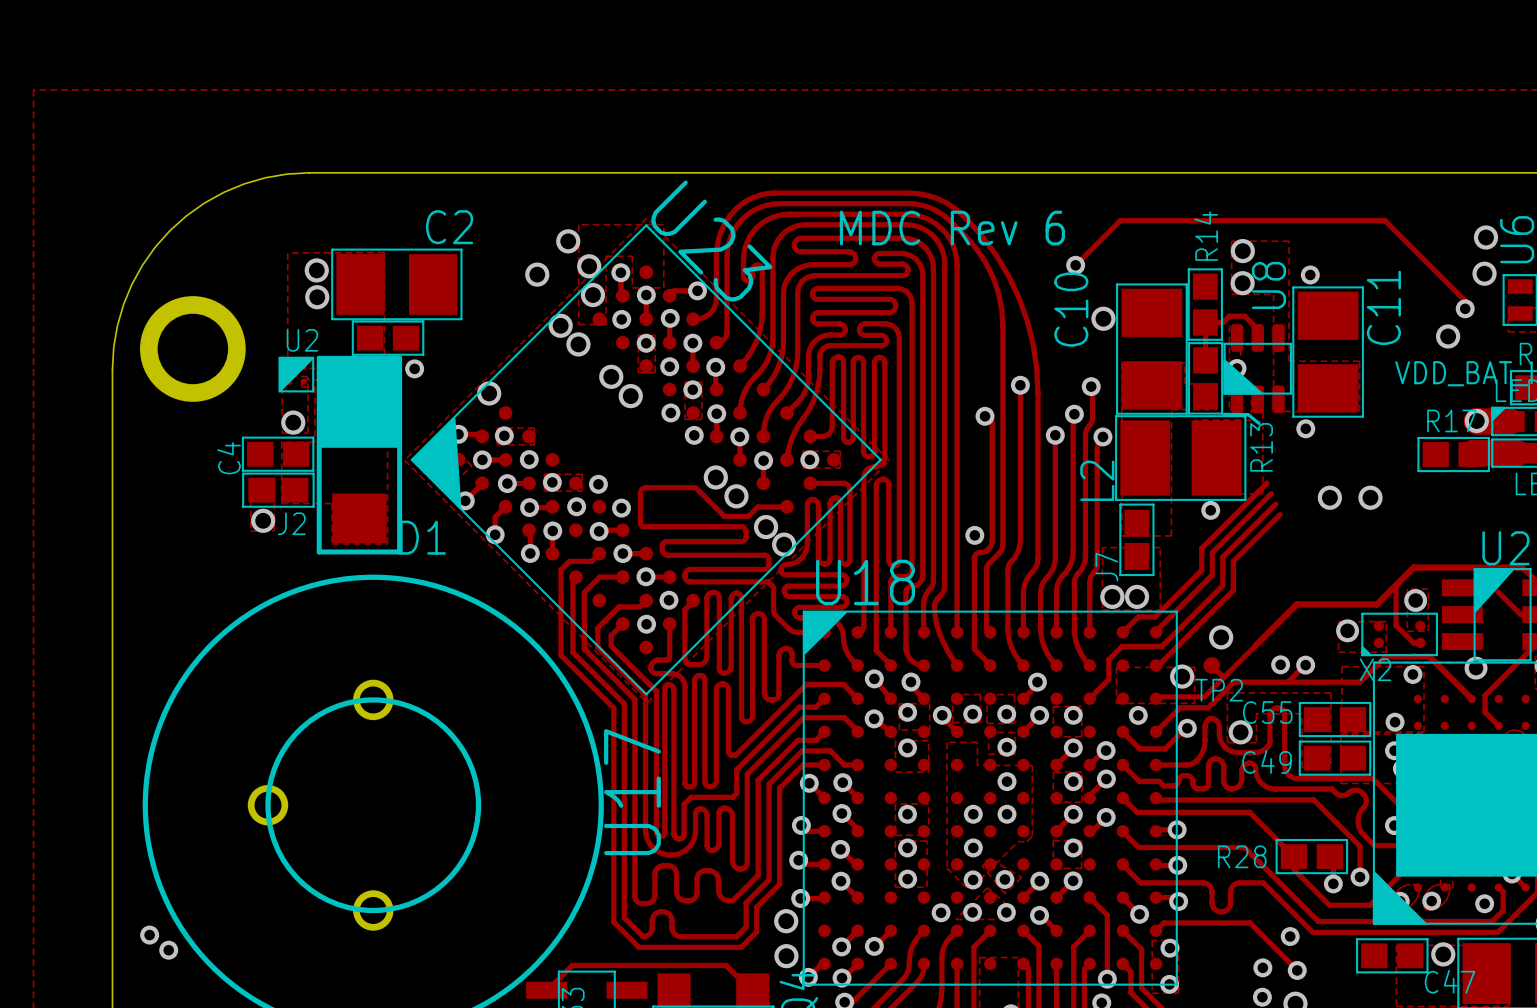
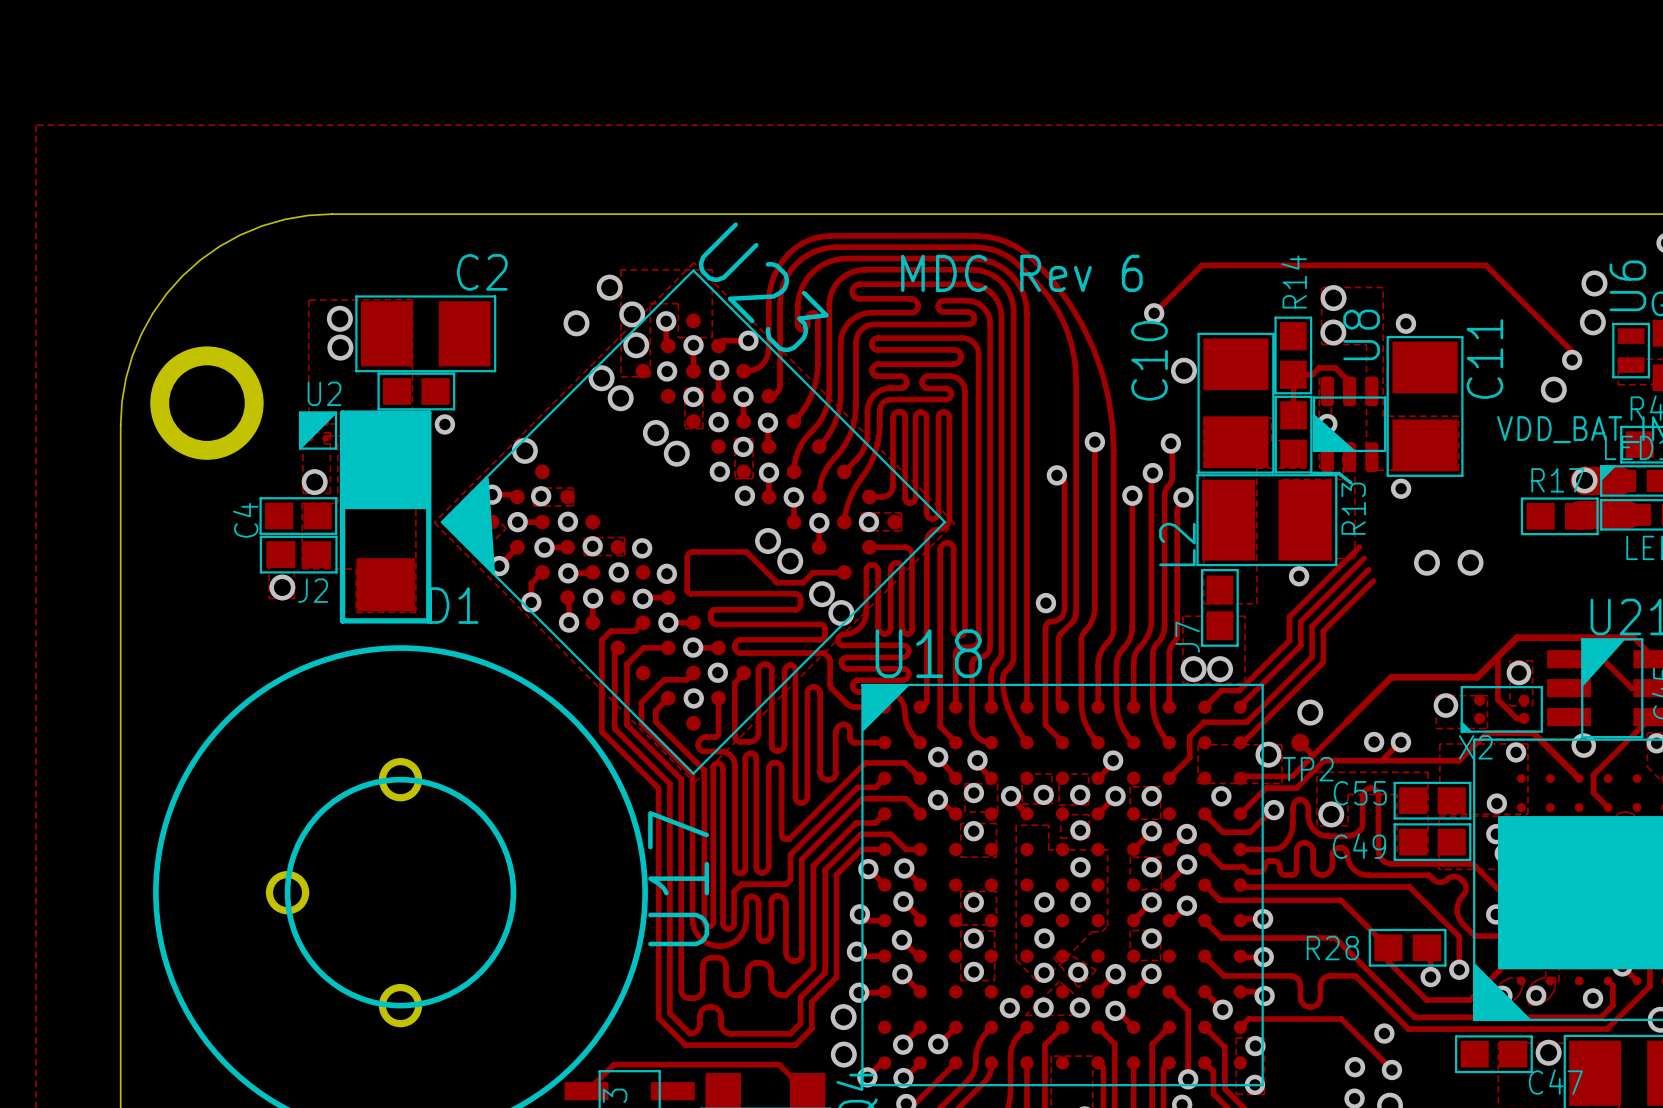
via: (149, 935) -> none
via: (168, 950) -> none

